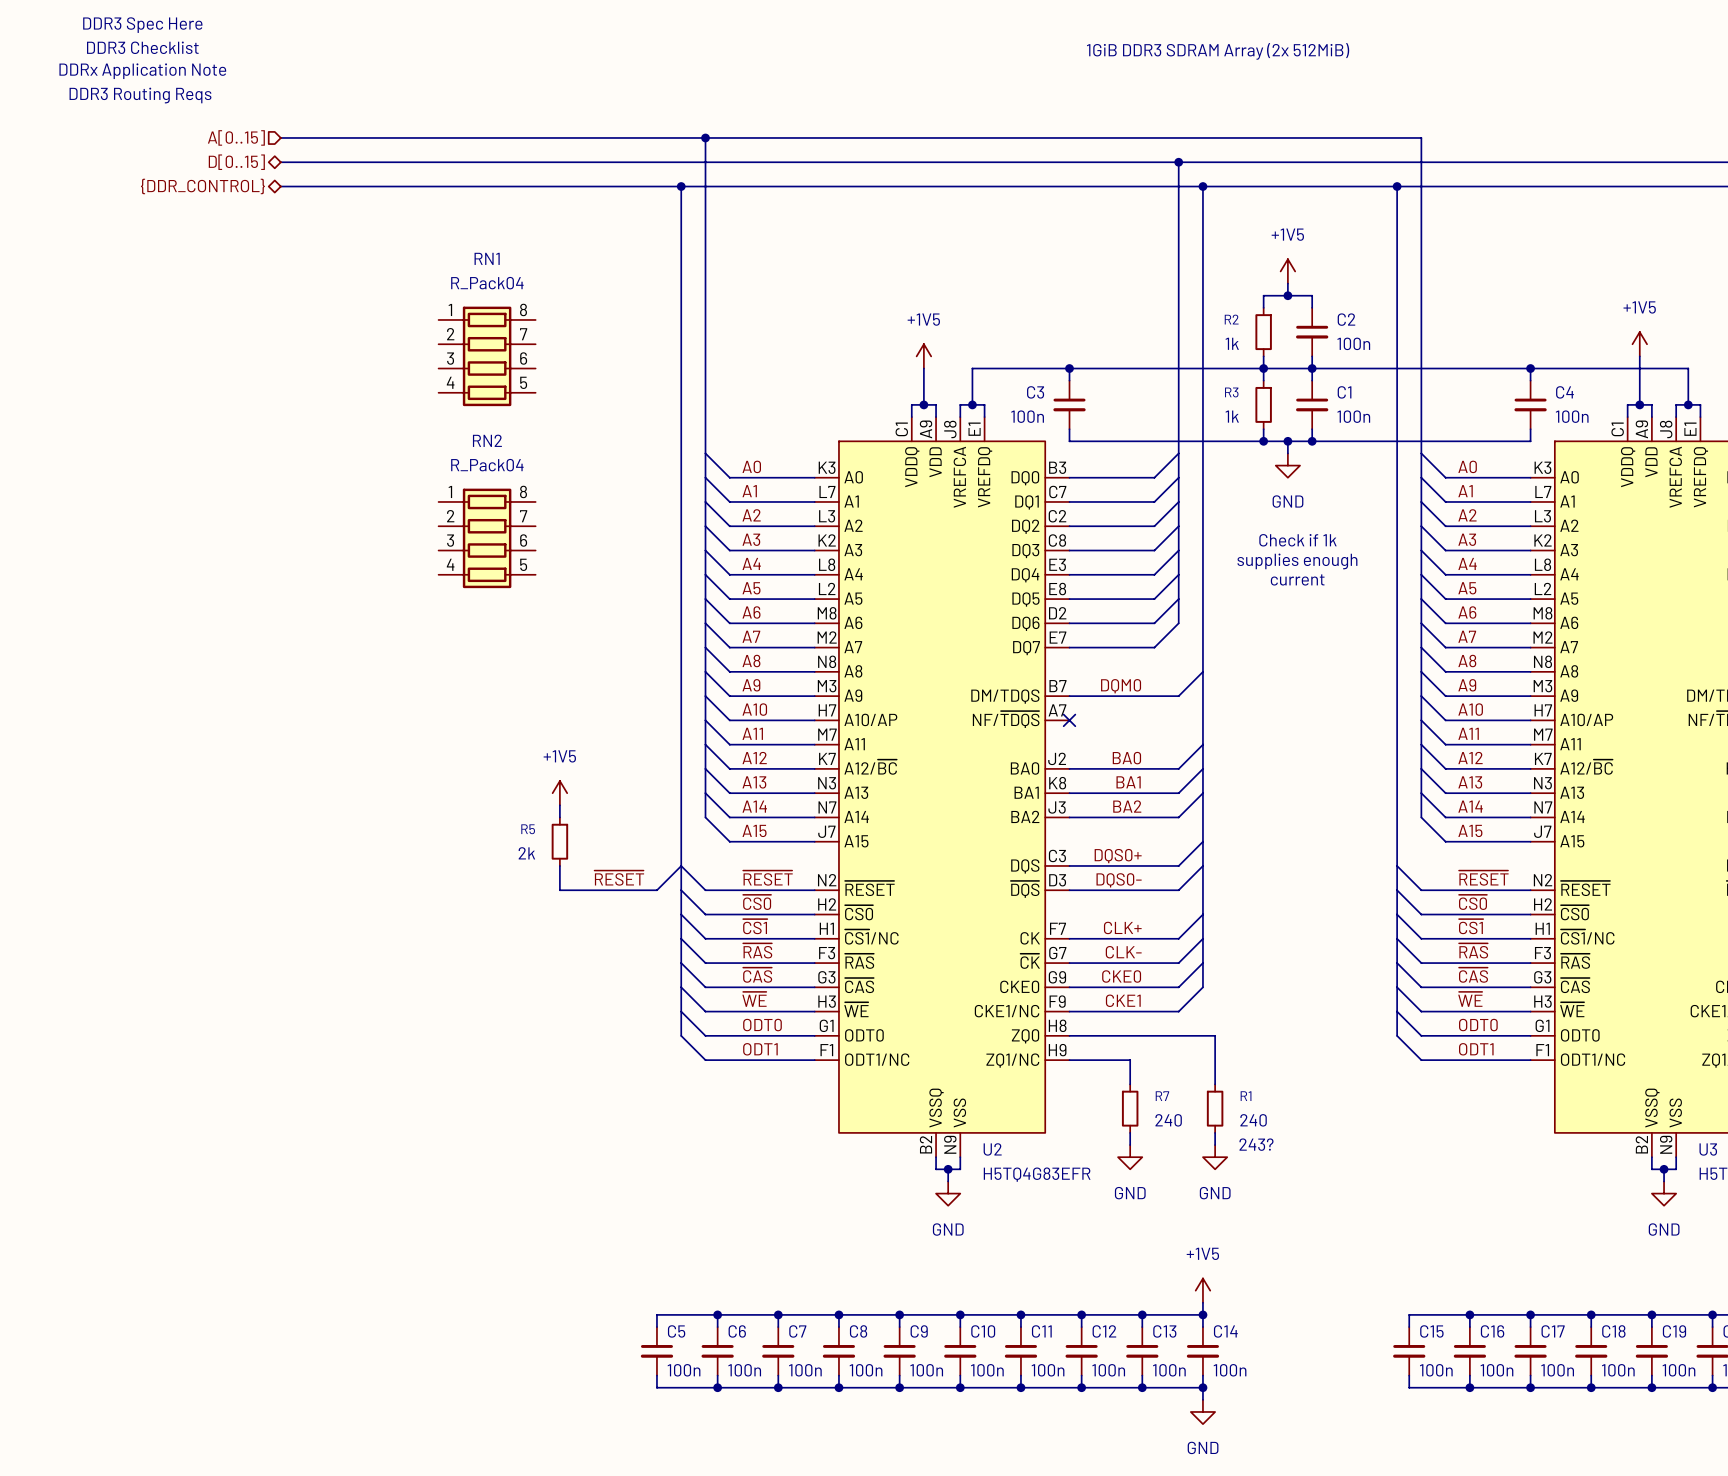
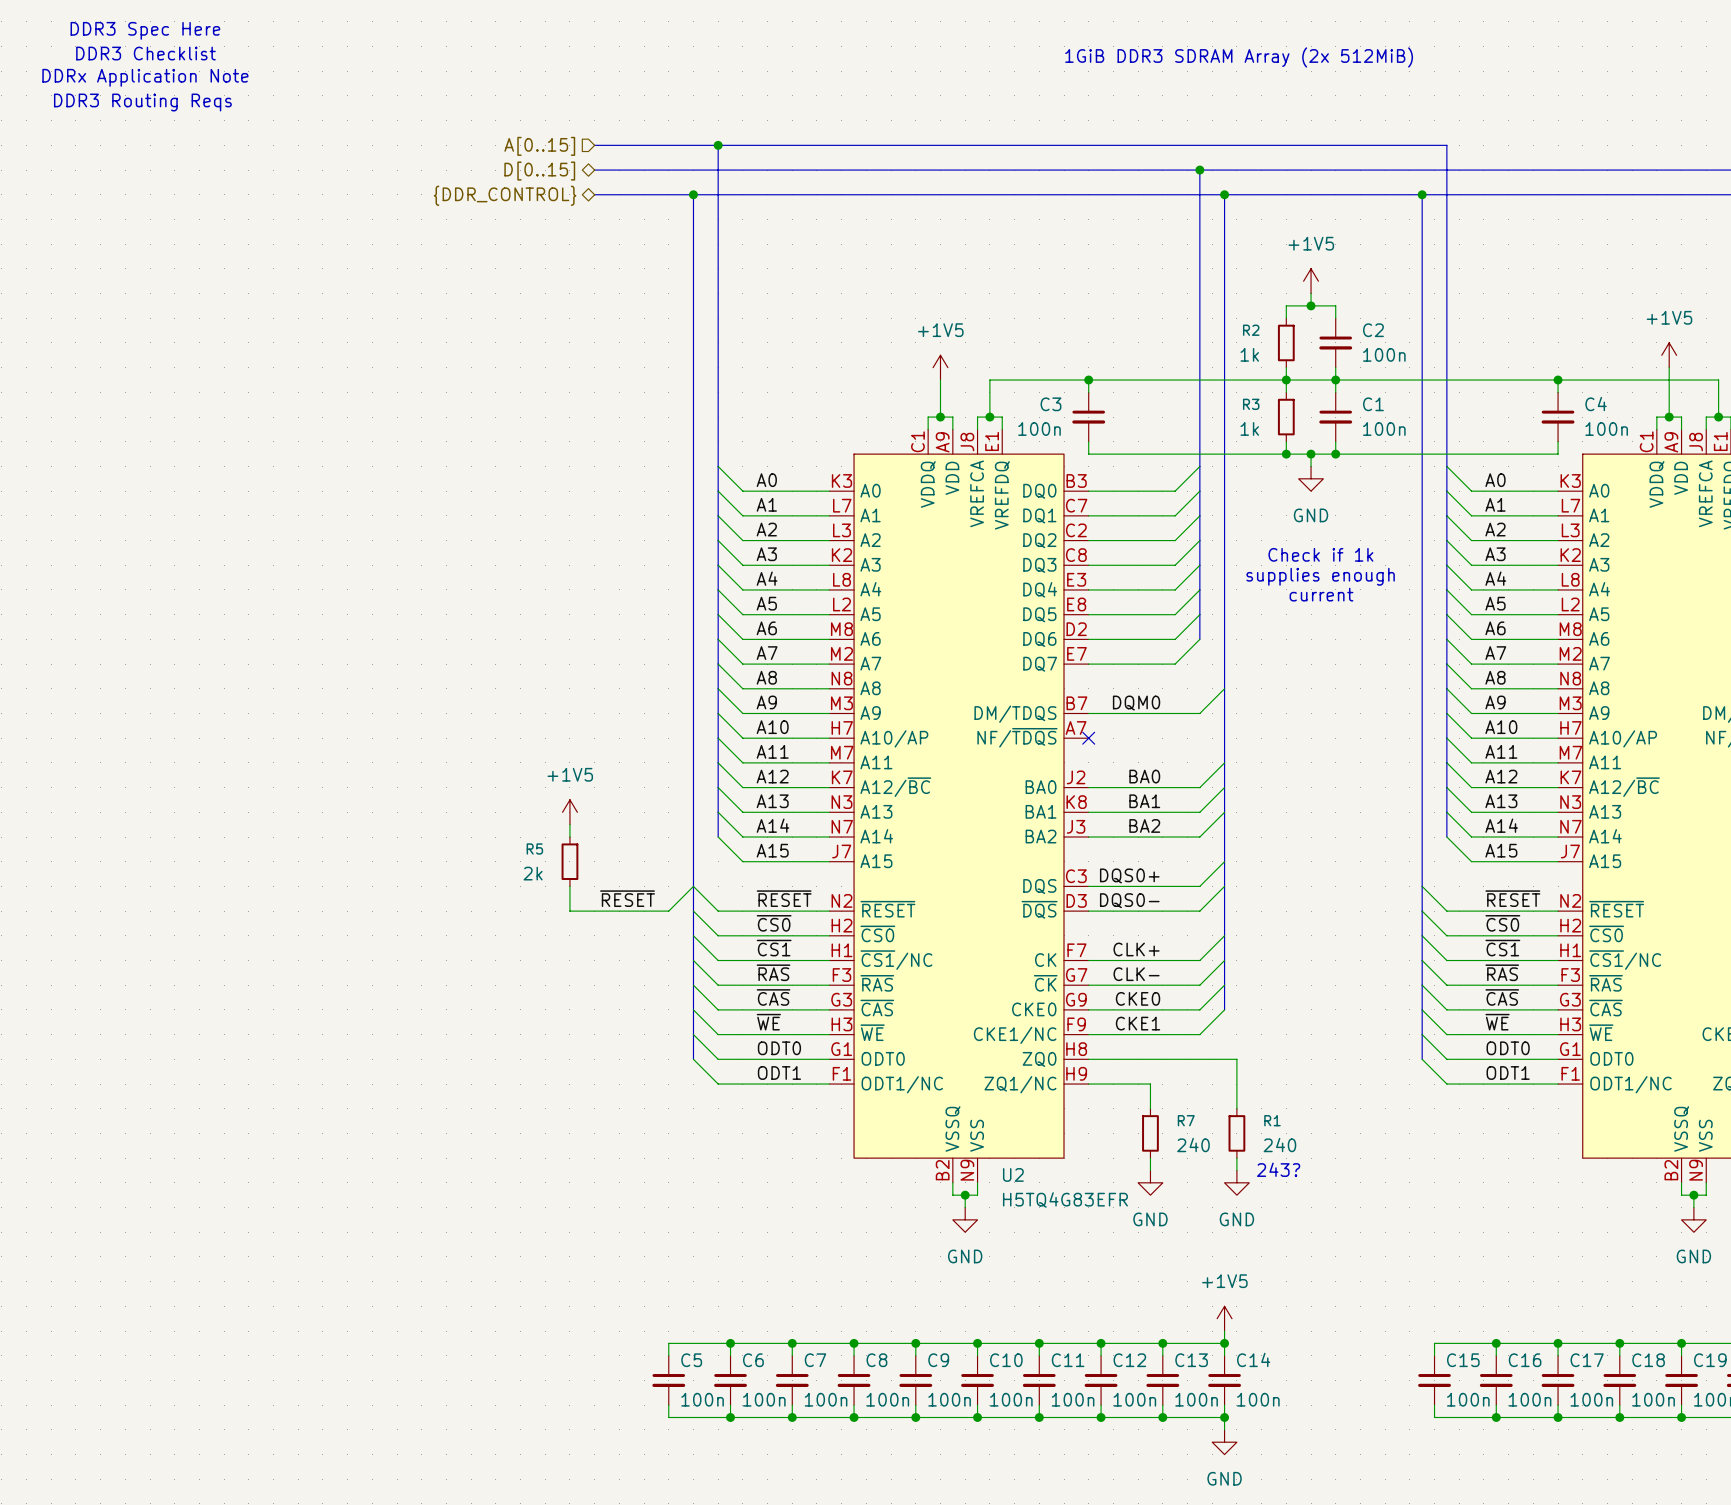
hierarchical label: A[0..15] (236, 137) -> none
bus: (280, 137) (584, 137) -> none
hierarchical label: none -> A[0..15] (539, 146)
hierarchical label: D[0..15] (236, 162) -> none
bus: (280, 162) (584, 162) -> none
hierarchical label: none -> D[0..15] (539, 171)
hierarchical label: {DDR_CONTROL} (202, 186) -> none
bus: (280, 186) (584, 186) -> none
hierarchical label: none -> {DDR_CONTROL} (505, 195)
RN1: R_Pack04 (487, 356) -> none
RN2: R_Pack04 (487, 538) -> none

